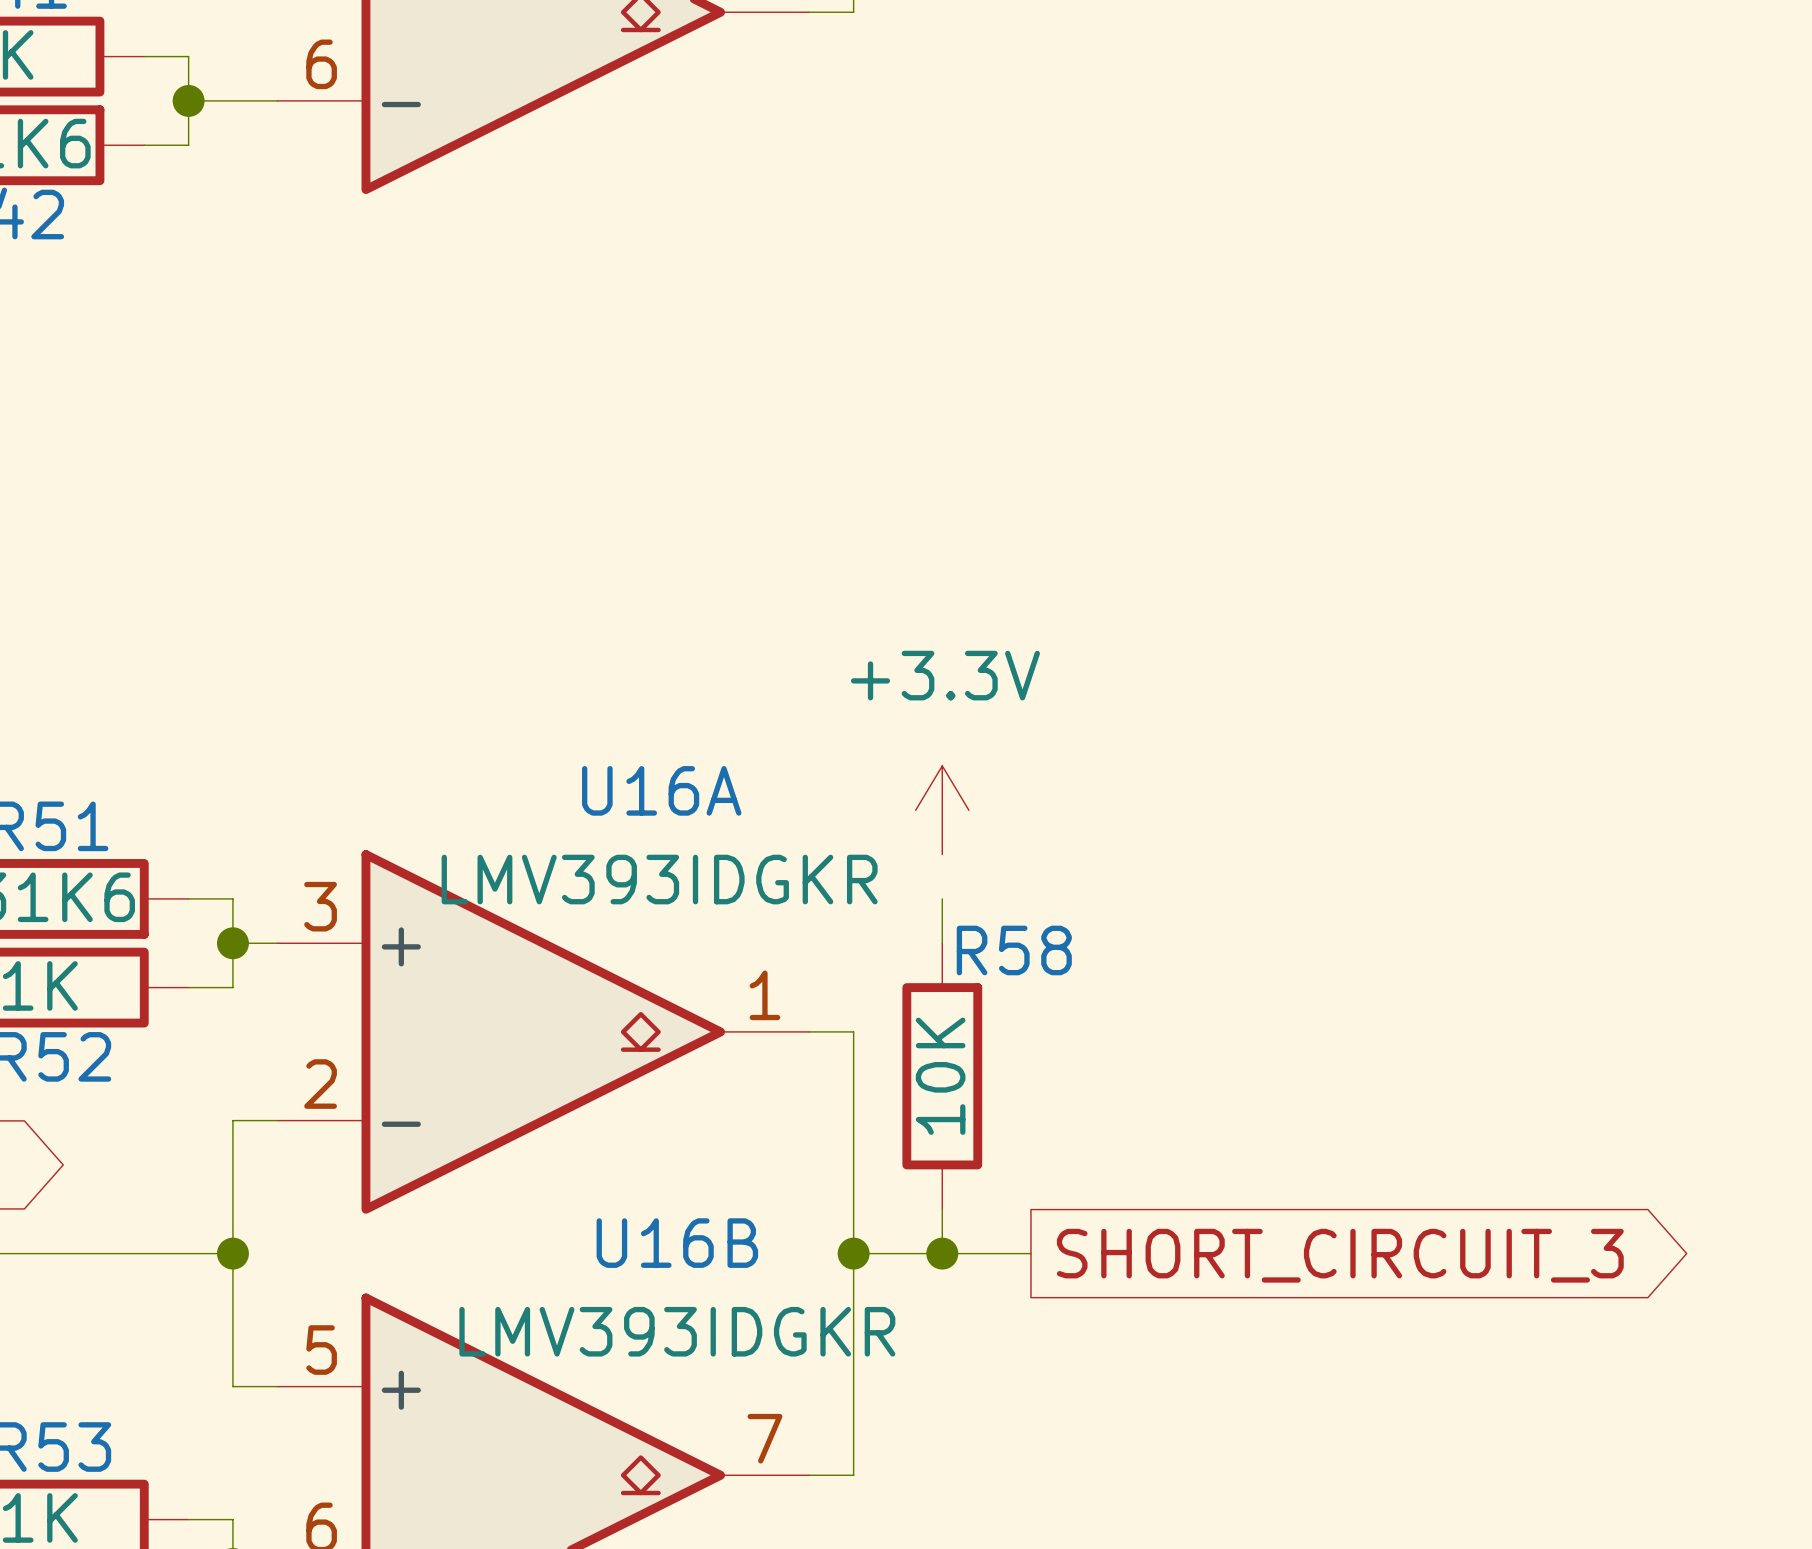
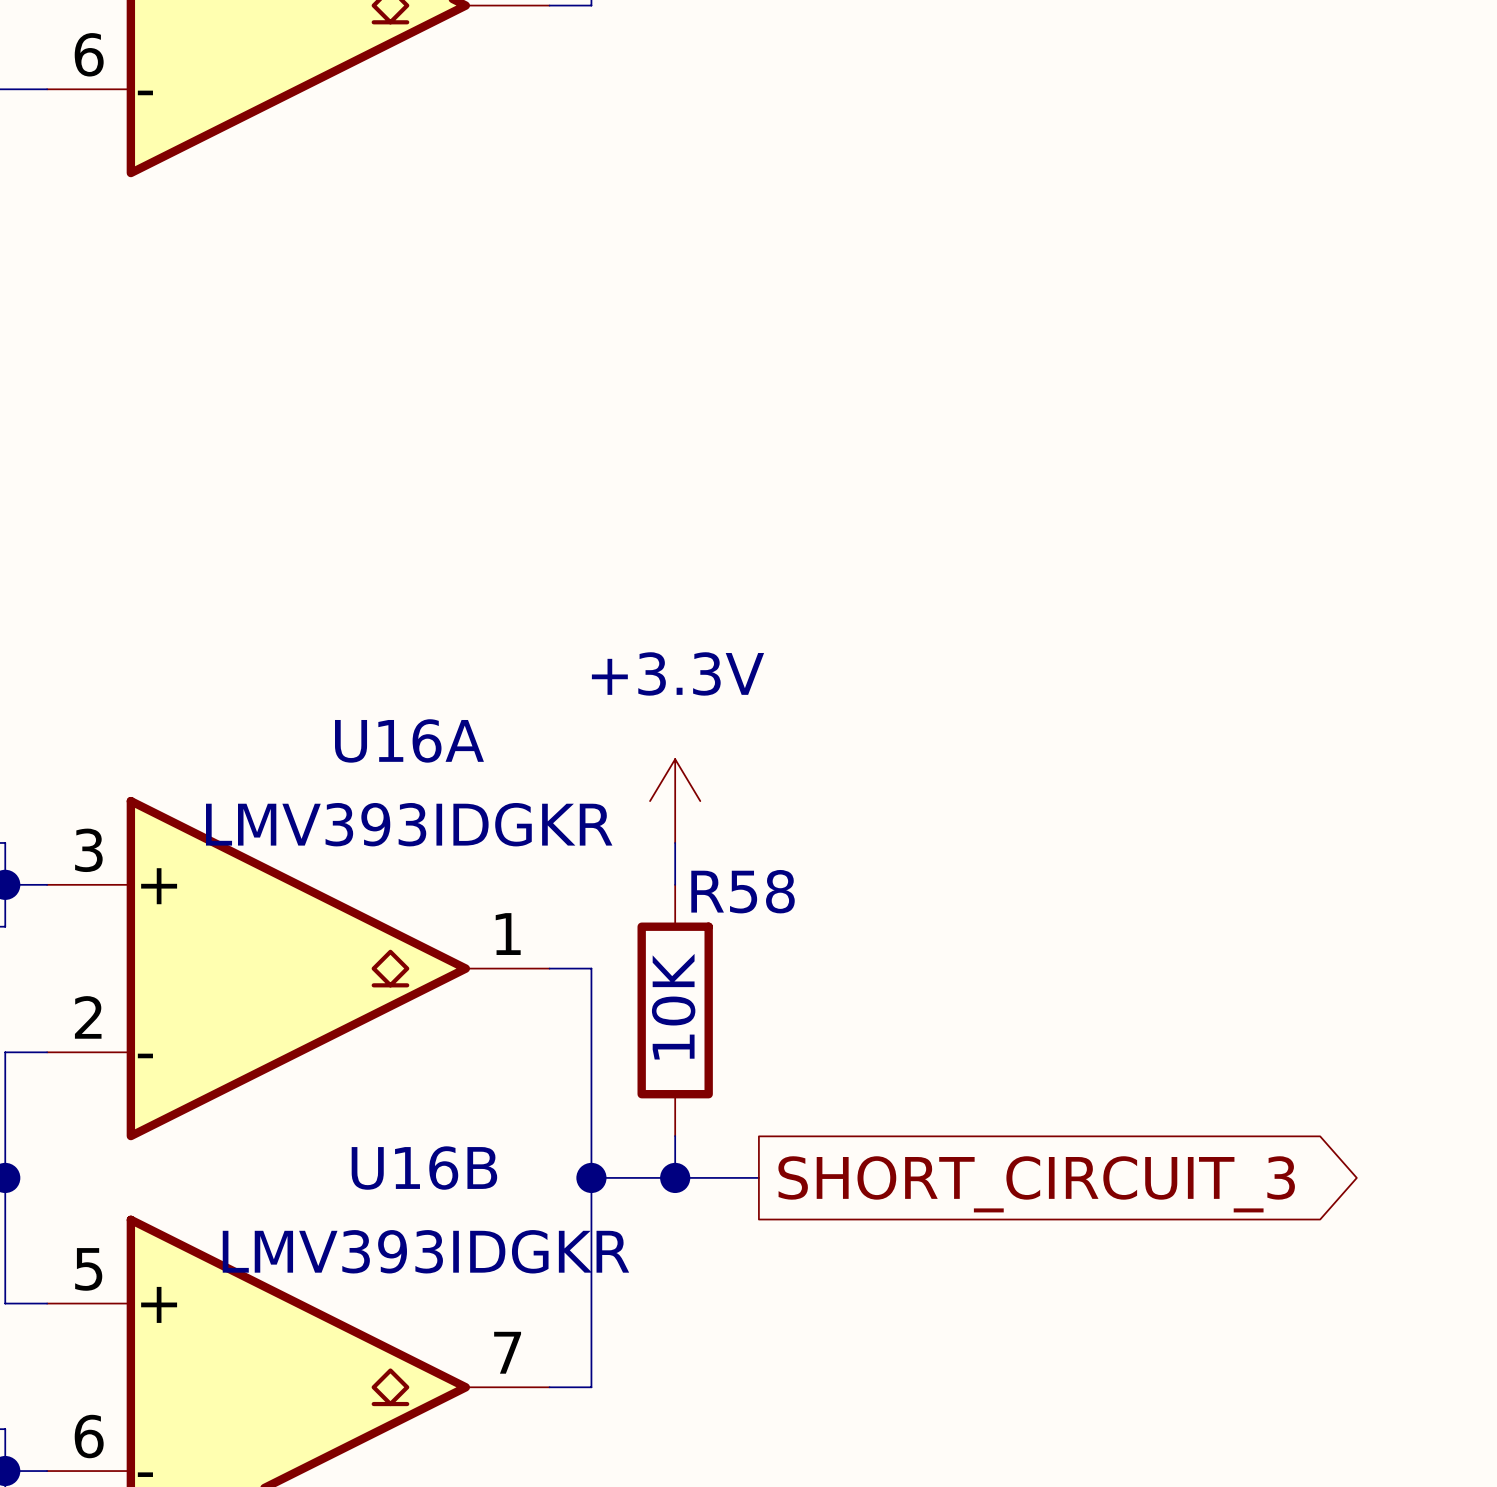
power symbol position: +3.3V (942, 810) -> +3.3V (675, 801)

